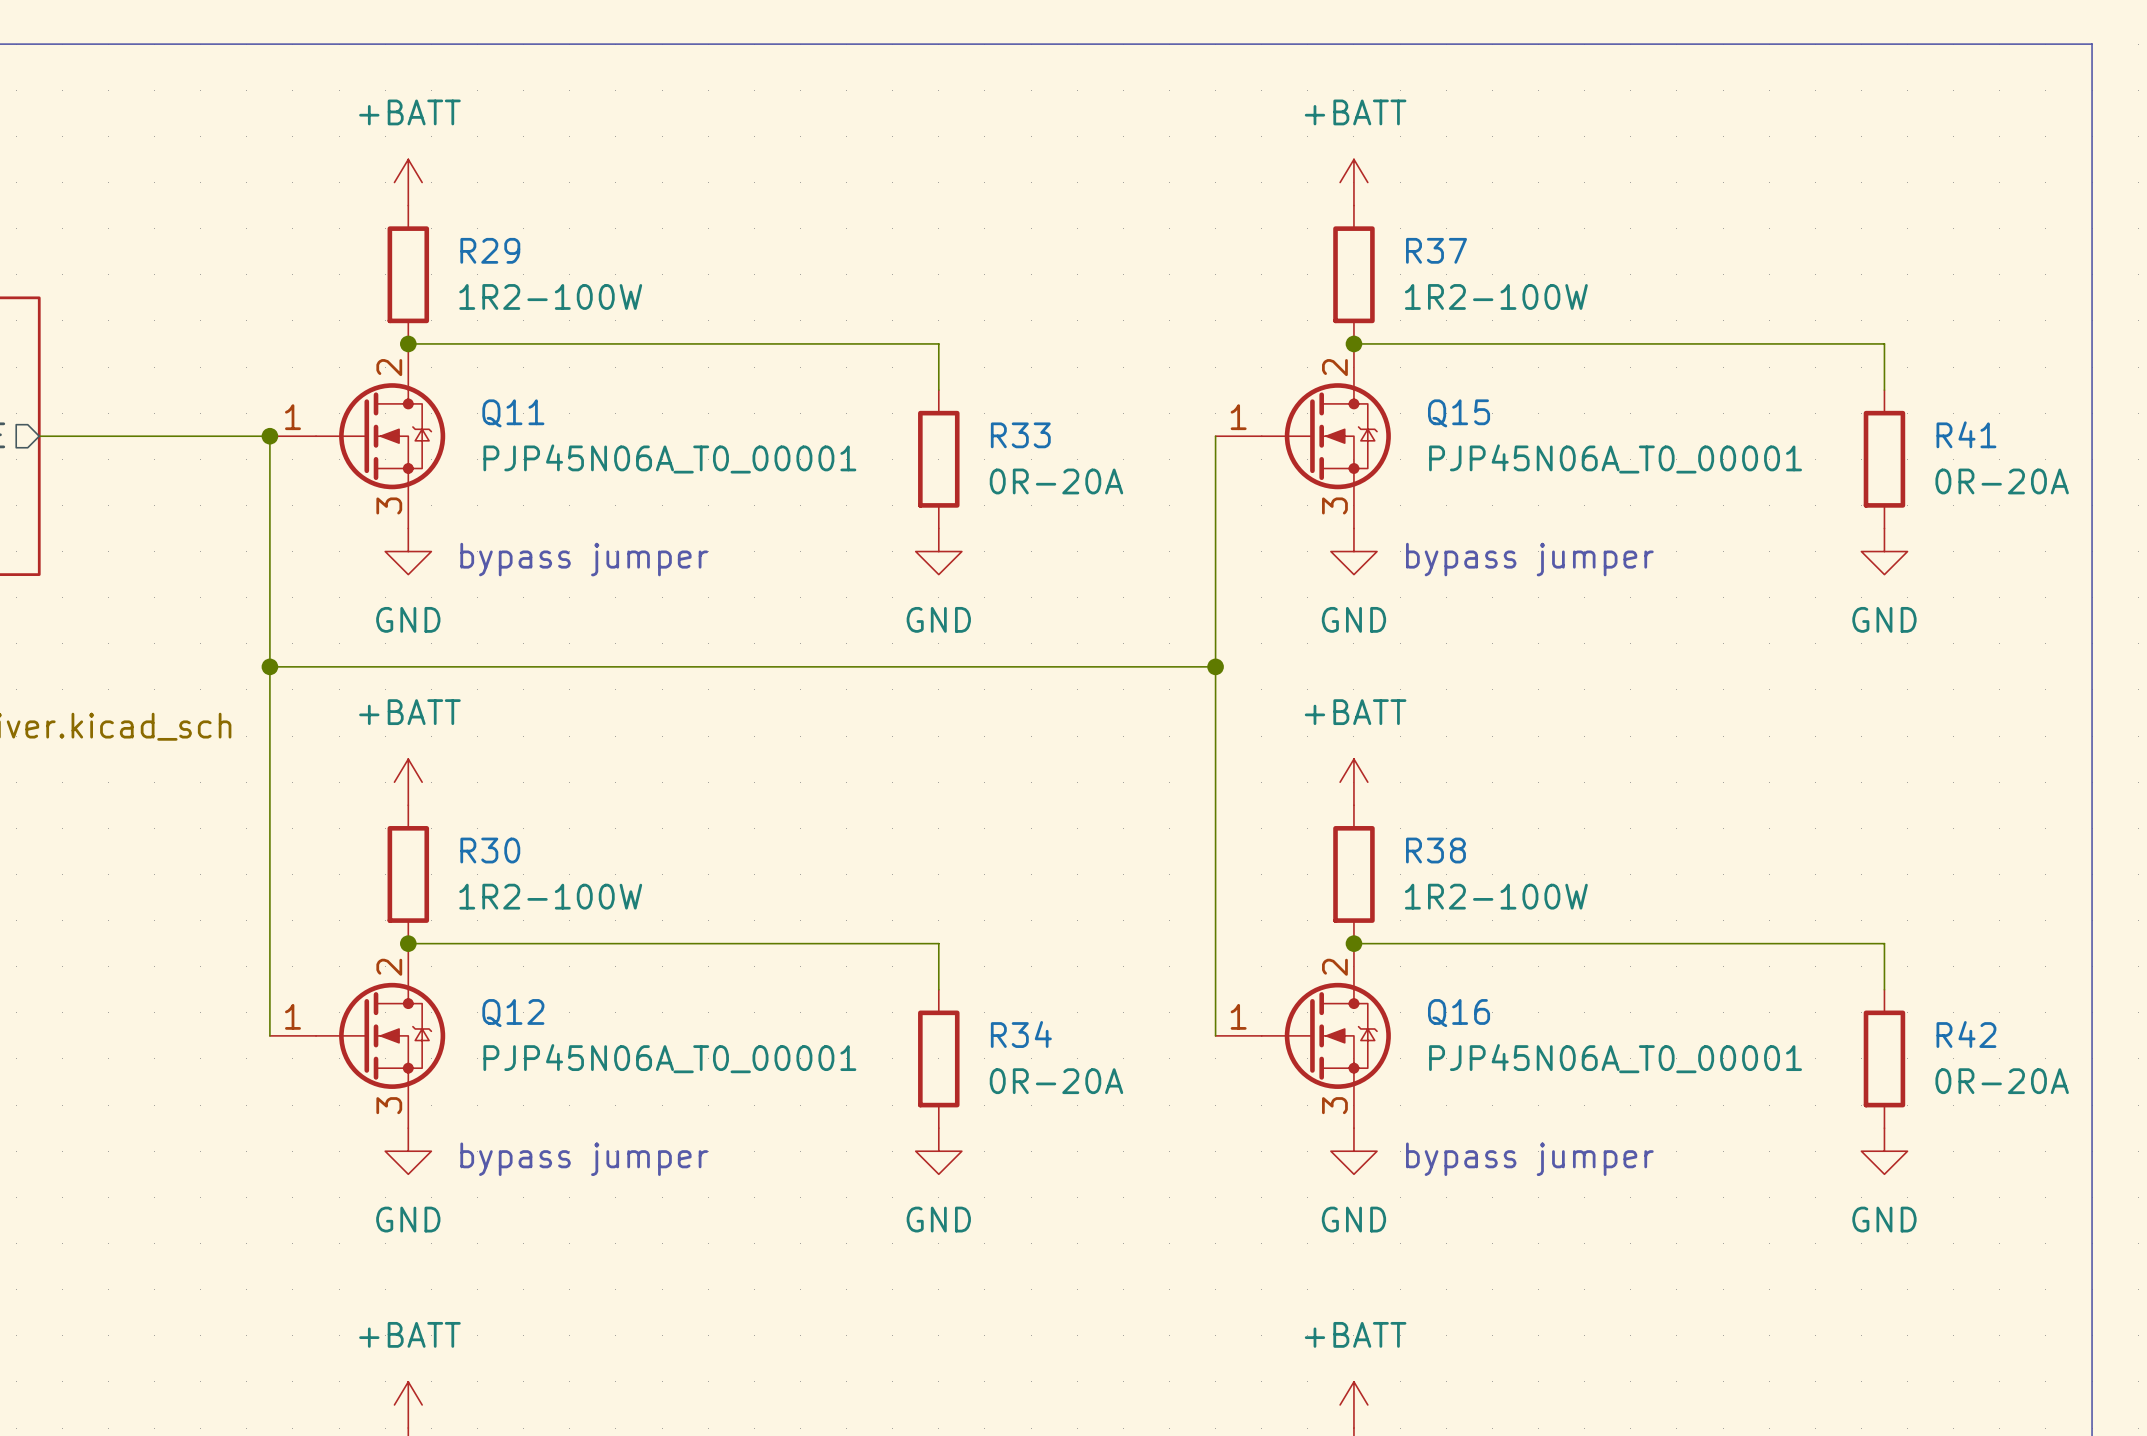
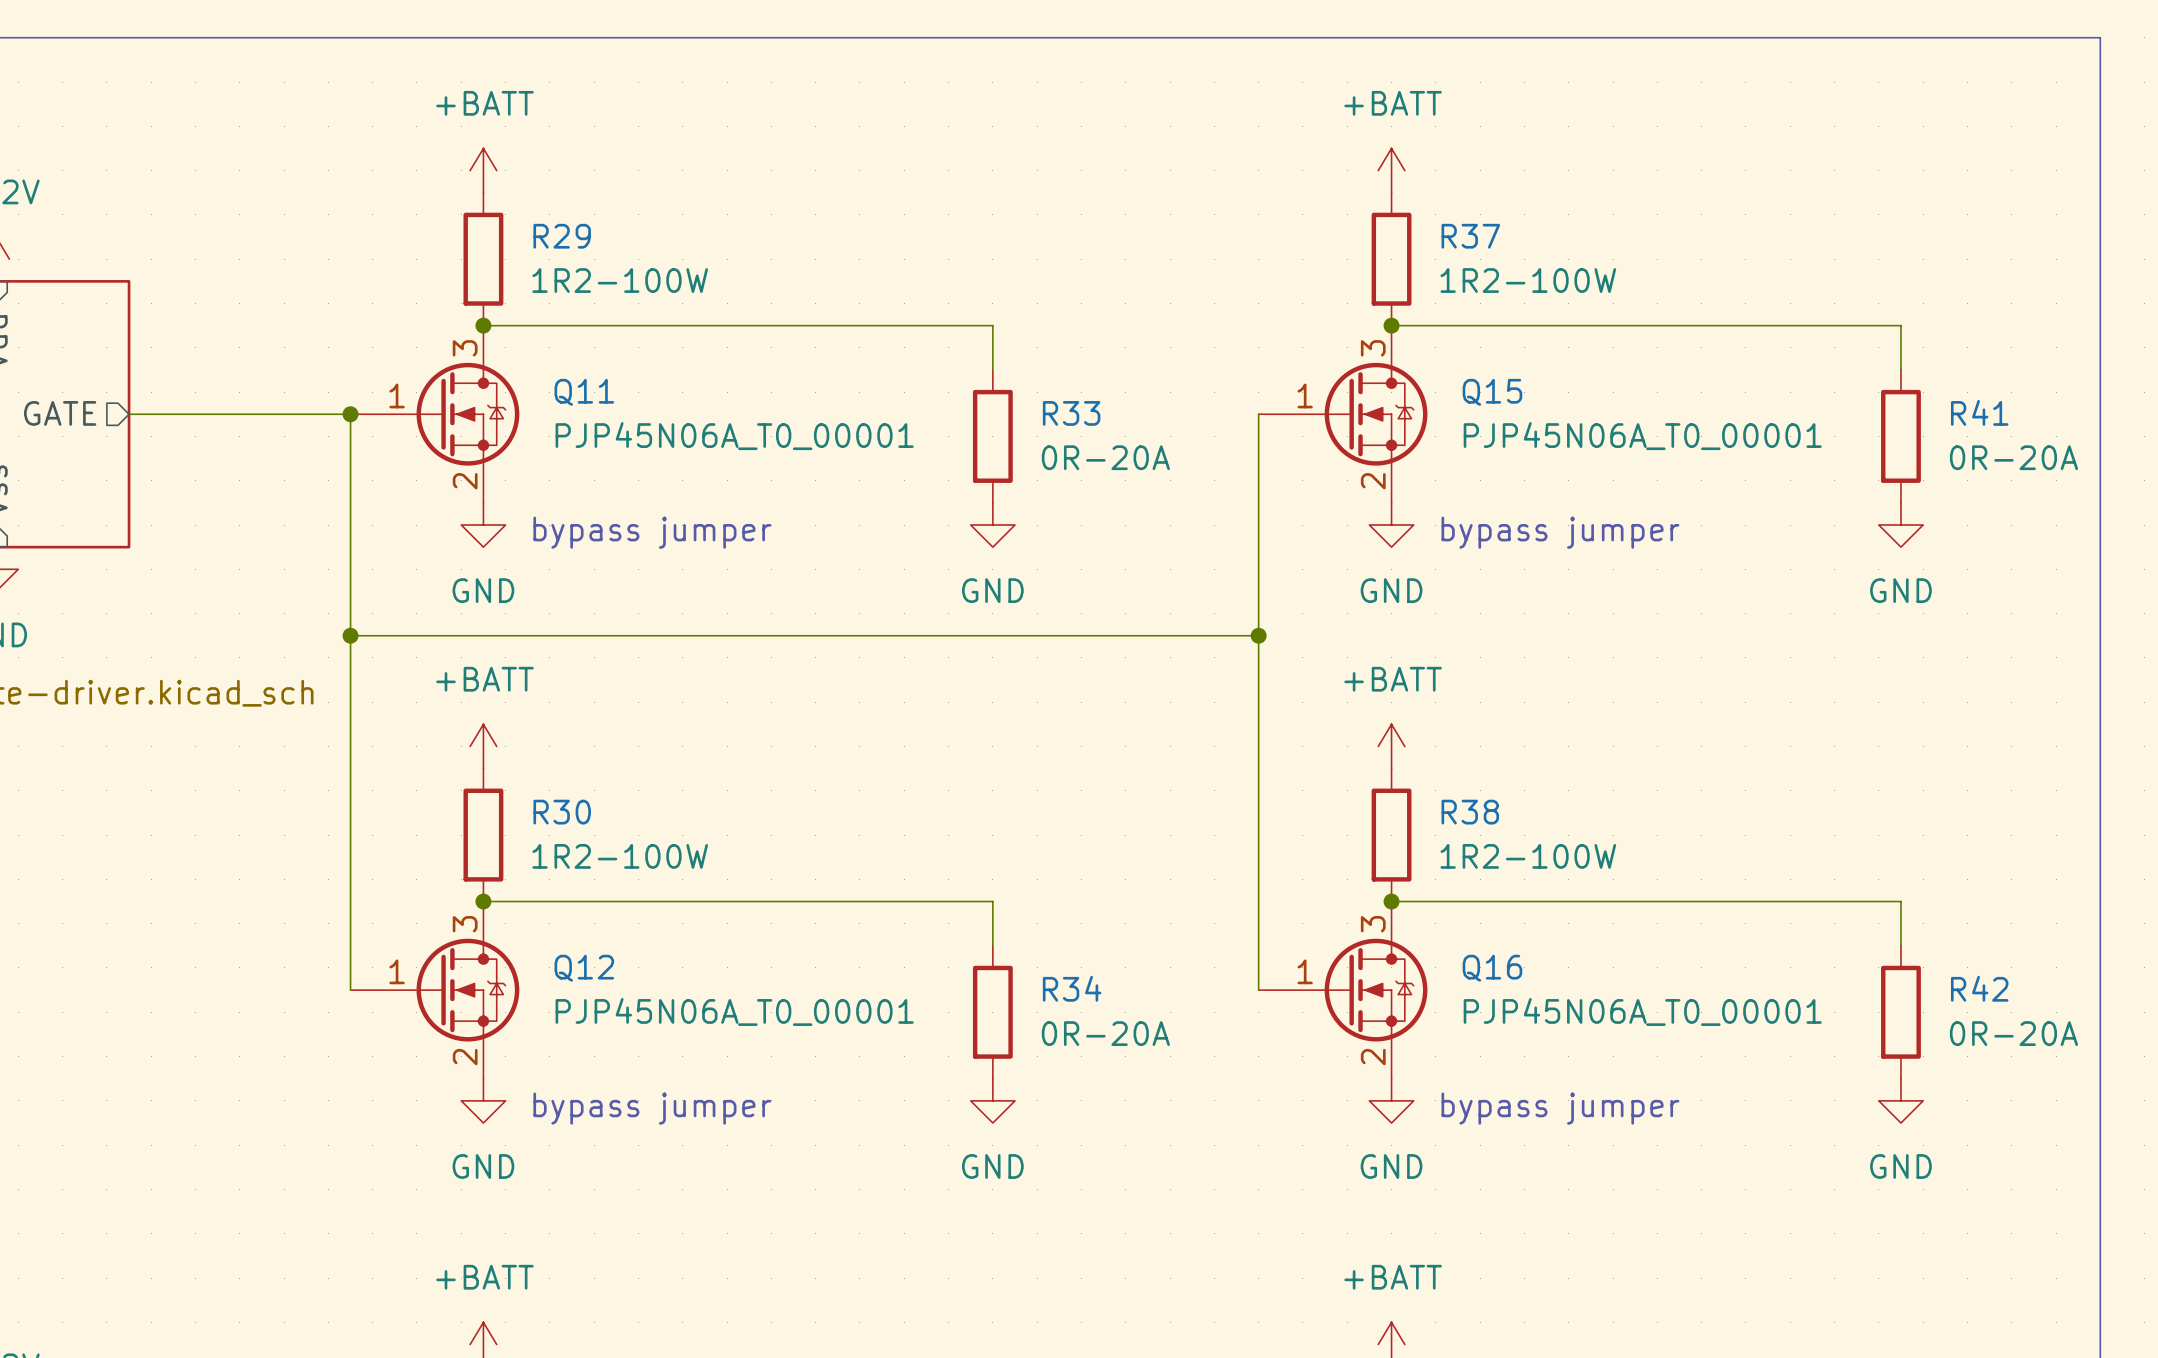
Q11 symbol: [269, 343, 446, 529] -> [350, 325, 520, 503]
Q15 symbol: [1215, 343, 1391, 529] -> [1258, 325, 1428, 503]
Q12 symbol: [269, 943, 446, 1129] -> [350, 901, 520, 1079]
Q16 symbol: [1215, 943, 1391, 1129] -> [1258, 901, 1428, 1079]

